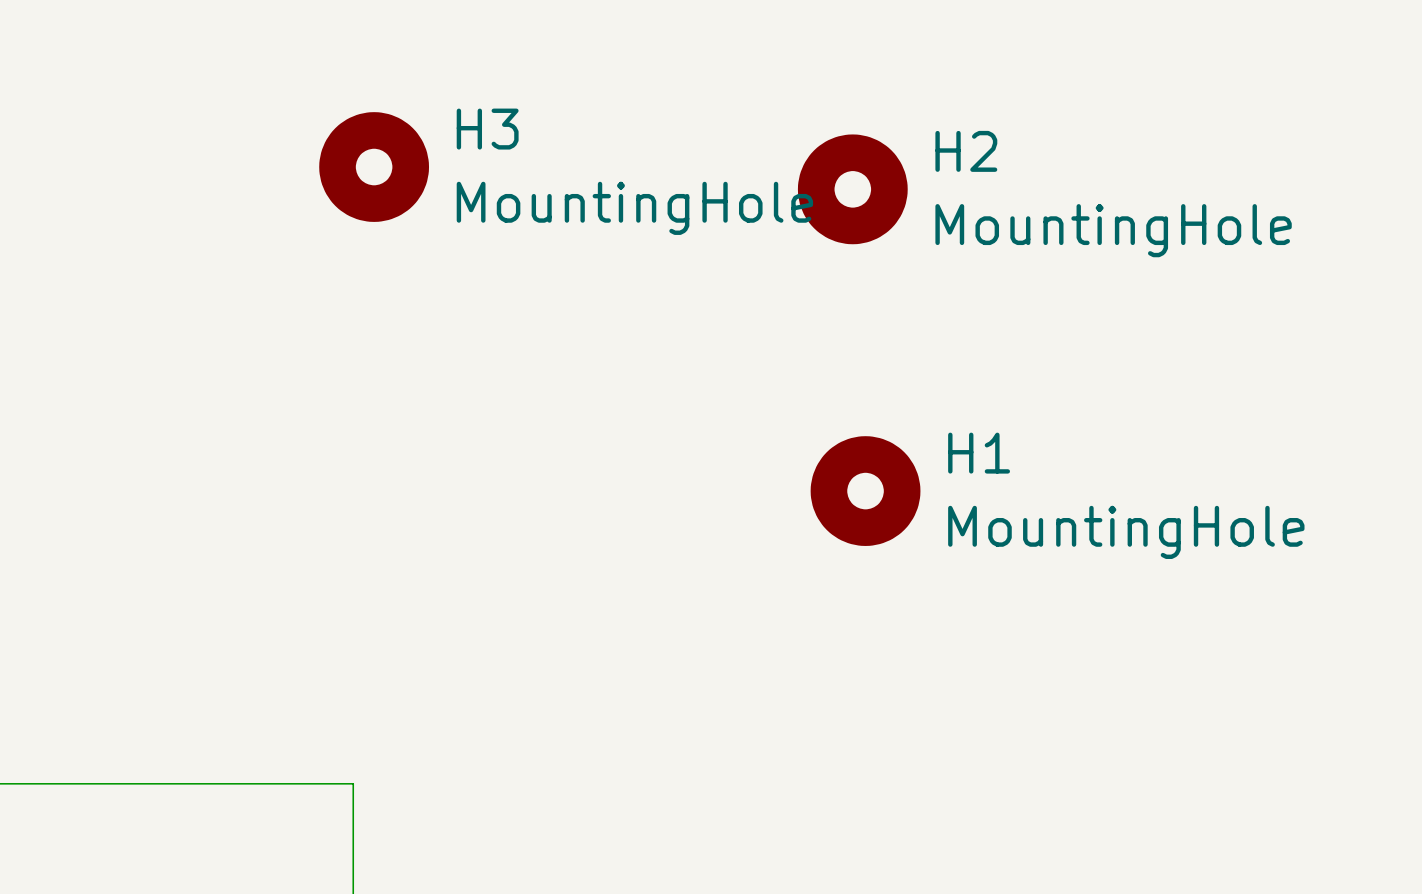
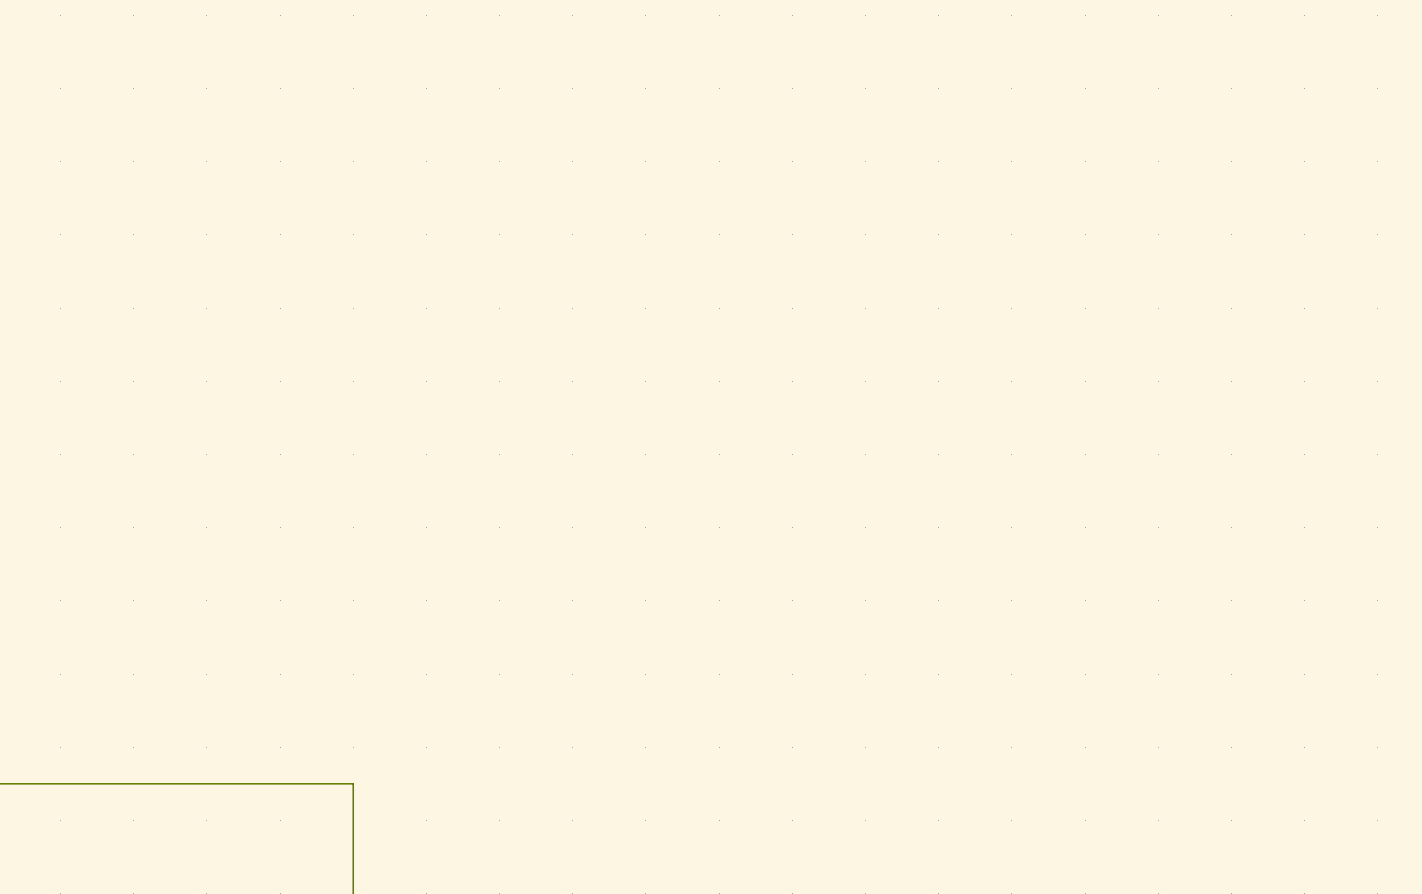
H3: MountingHole (374, 167) -> none
H2: MountingHole (852, 189) -> none
H1: MountingHole (865, 491) -> none

